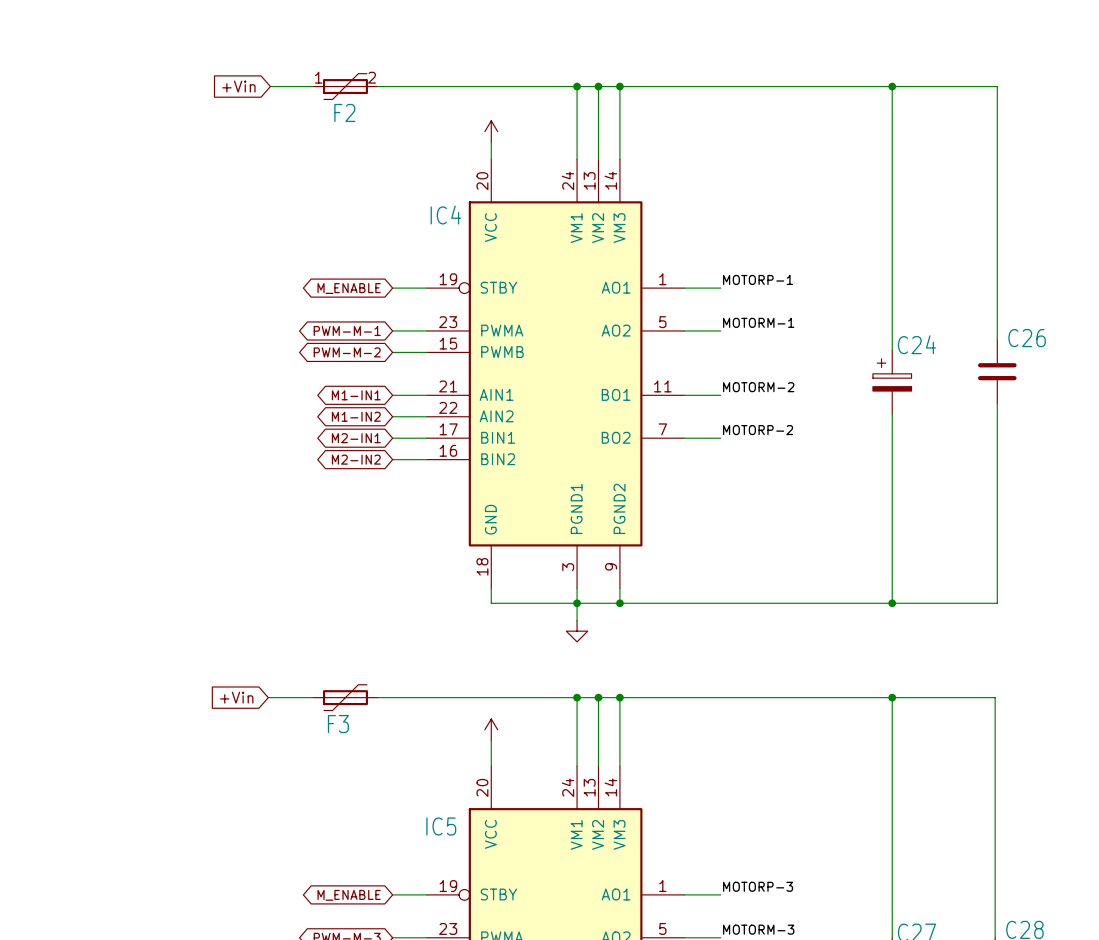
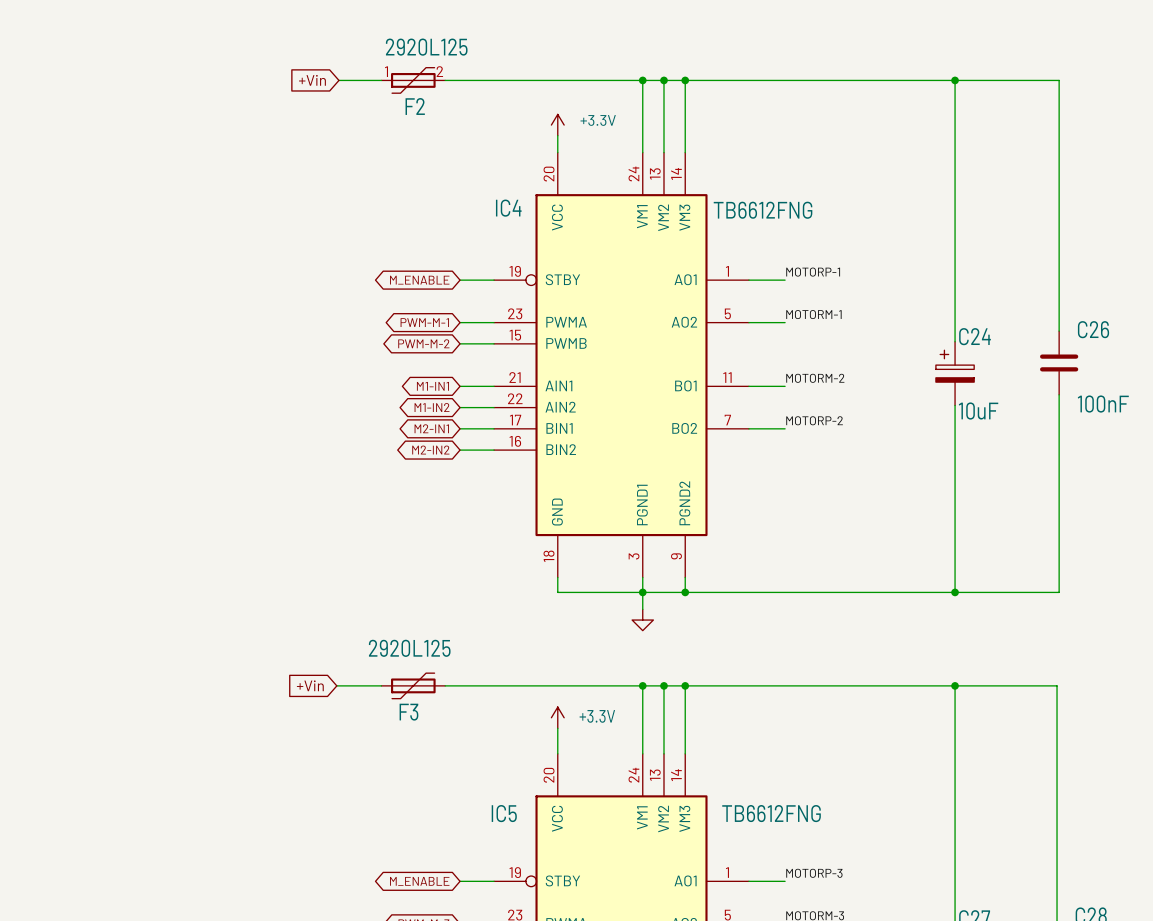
F2 value: none -> 2920L125 (426, 47)
power symbol text: none -> +3.3V (598, 120)
IC4 value: none -> TB6612FNG (763, 210)
C26 value: none -> 100nF (1103, 404)
C24 value: none -> 10uF (978, 411)
F3 value: none -> 2920L125 (409, 648)
power symbol text: none -> +3.3V (597, 716)
IC5 value: none -> TB6612FNG (771, 813)

